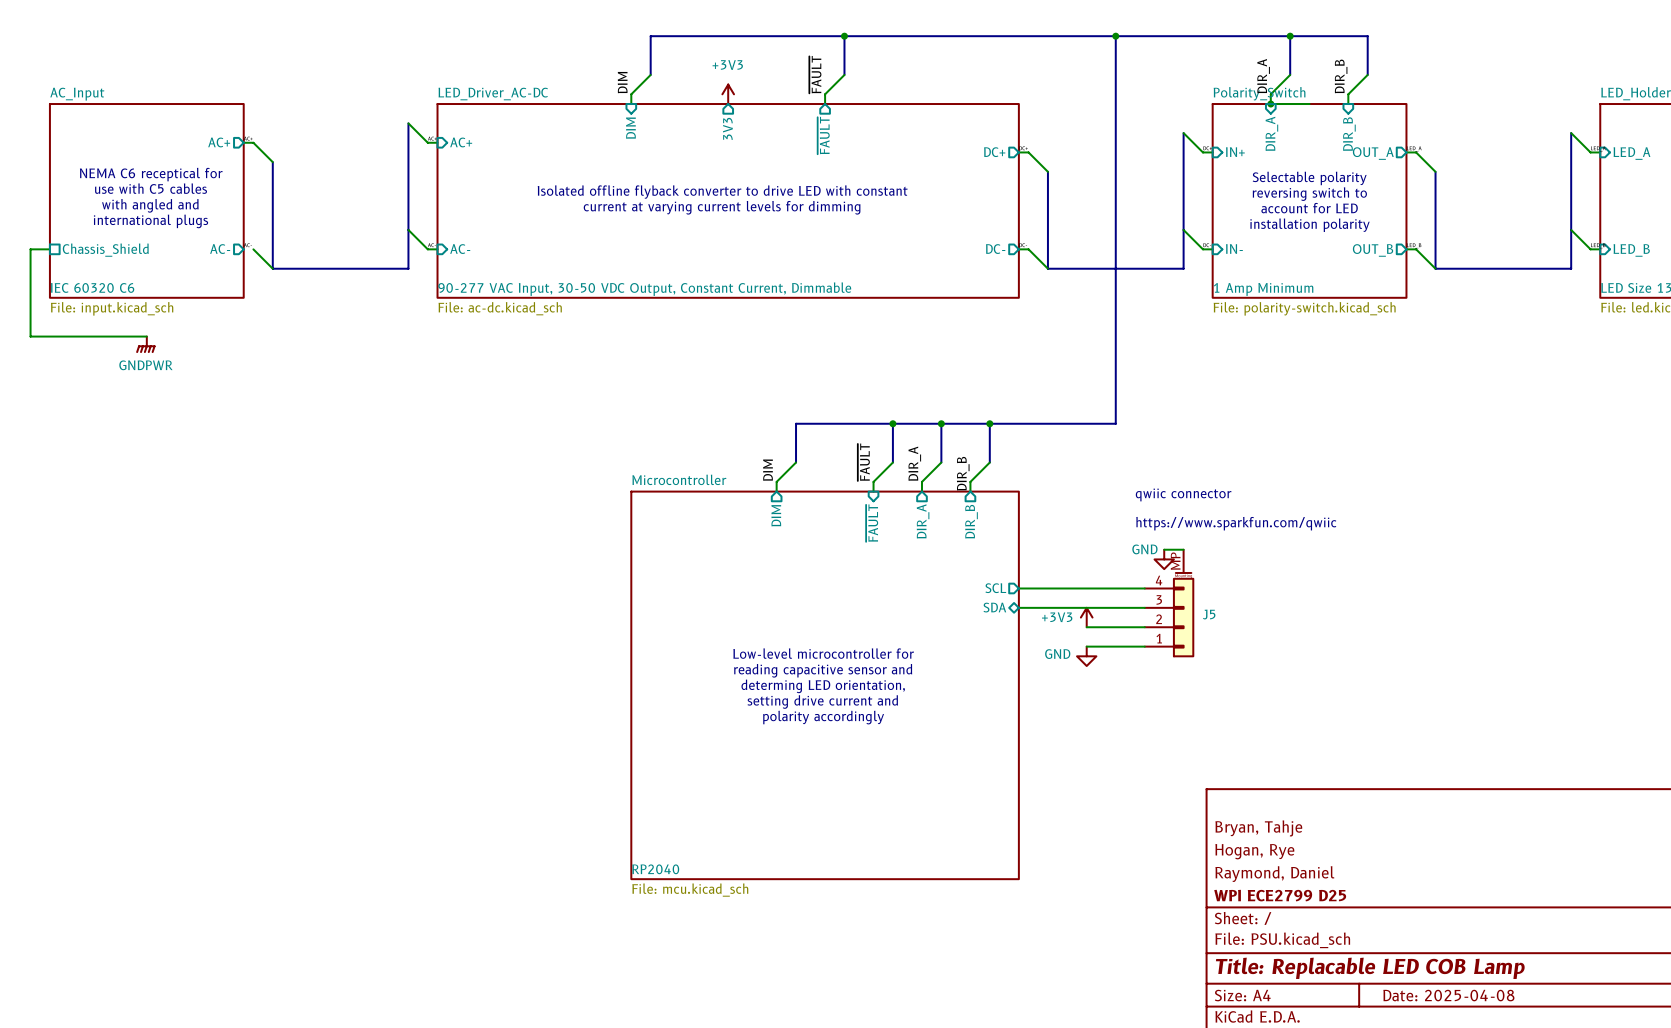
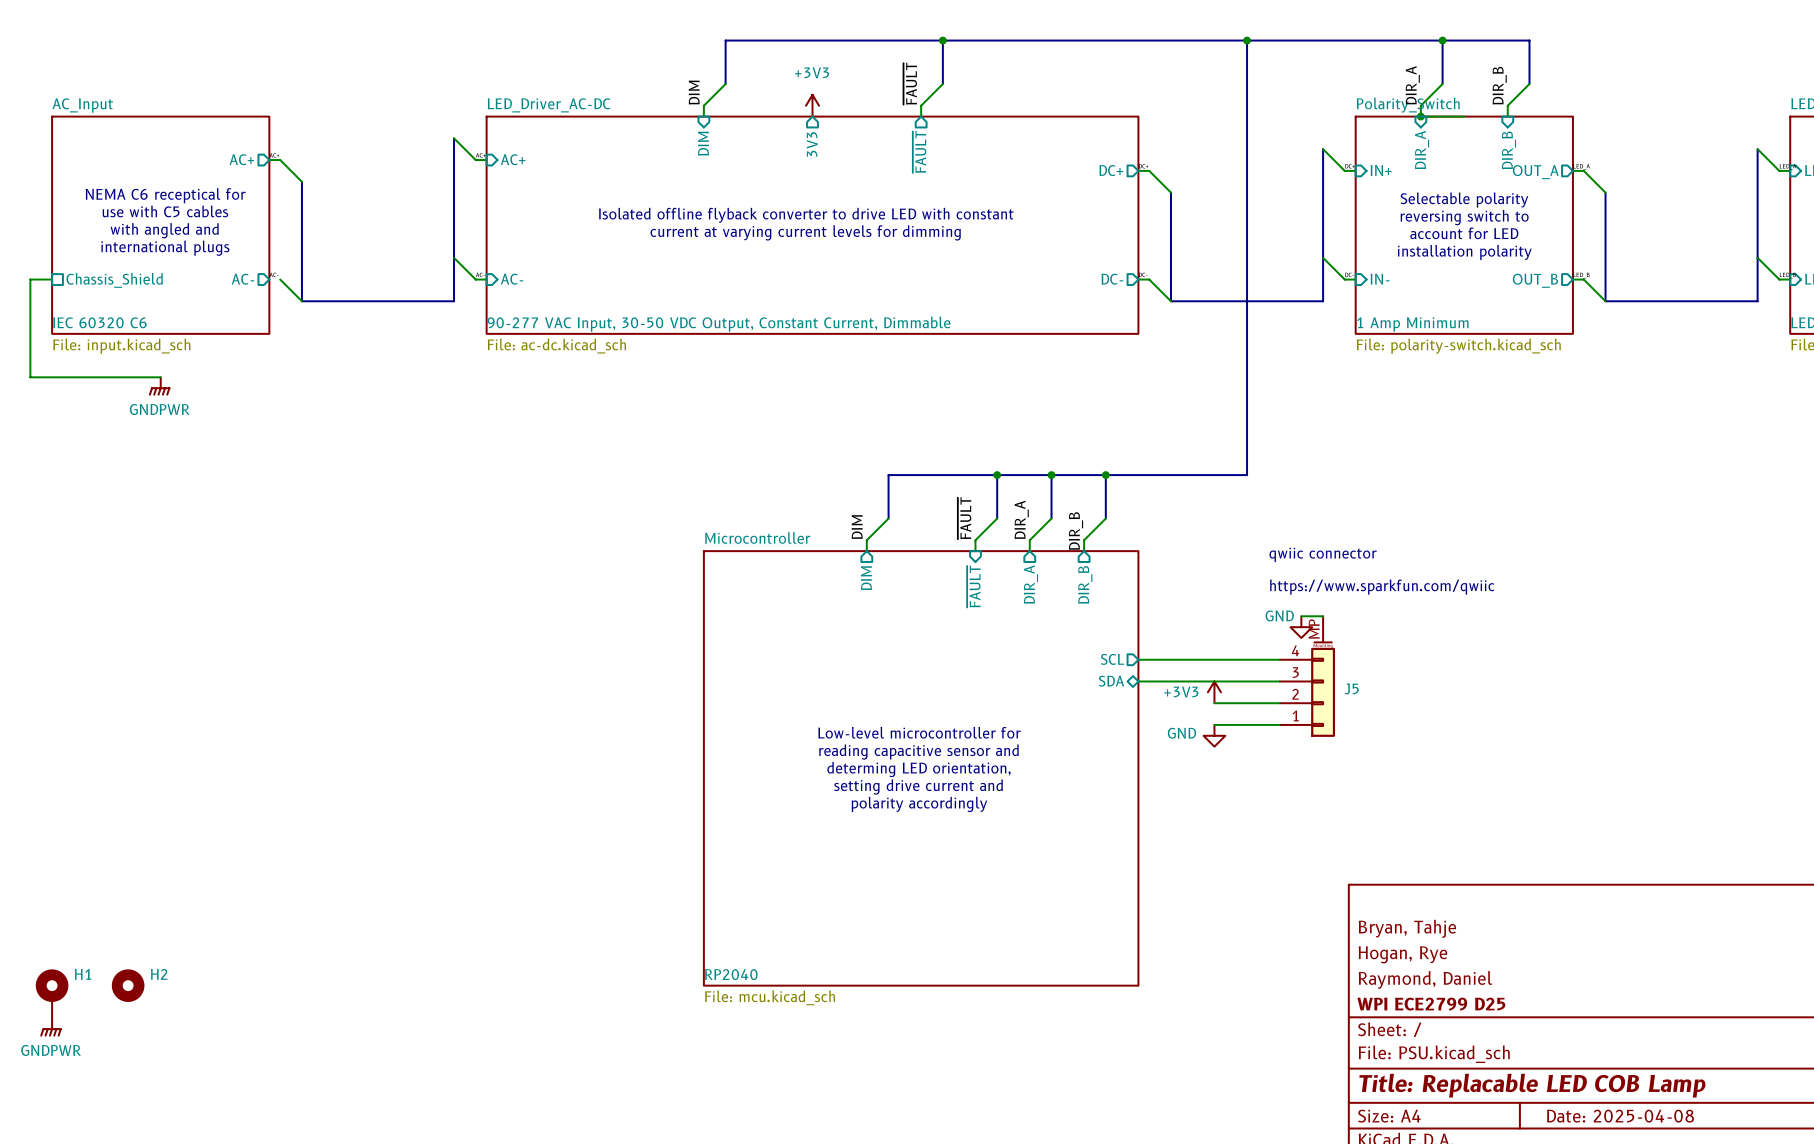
H2: none -> (128, 985)
H1: none -> (52, 993)
power symbol: none -> GNDPWR (51, 1027)

